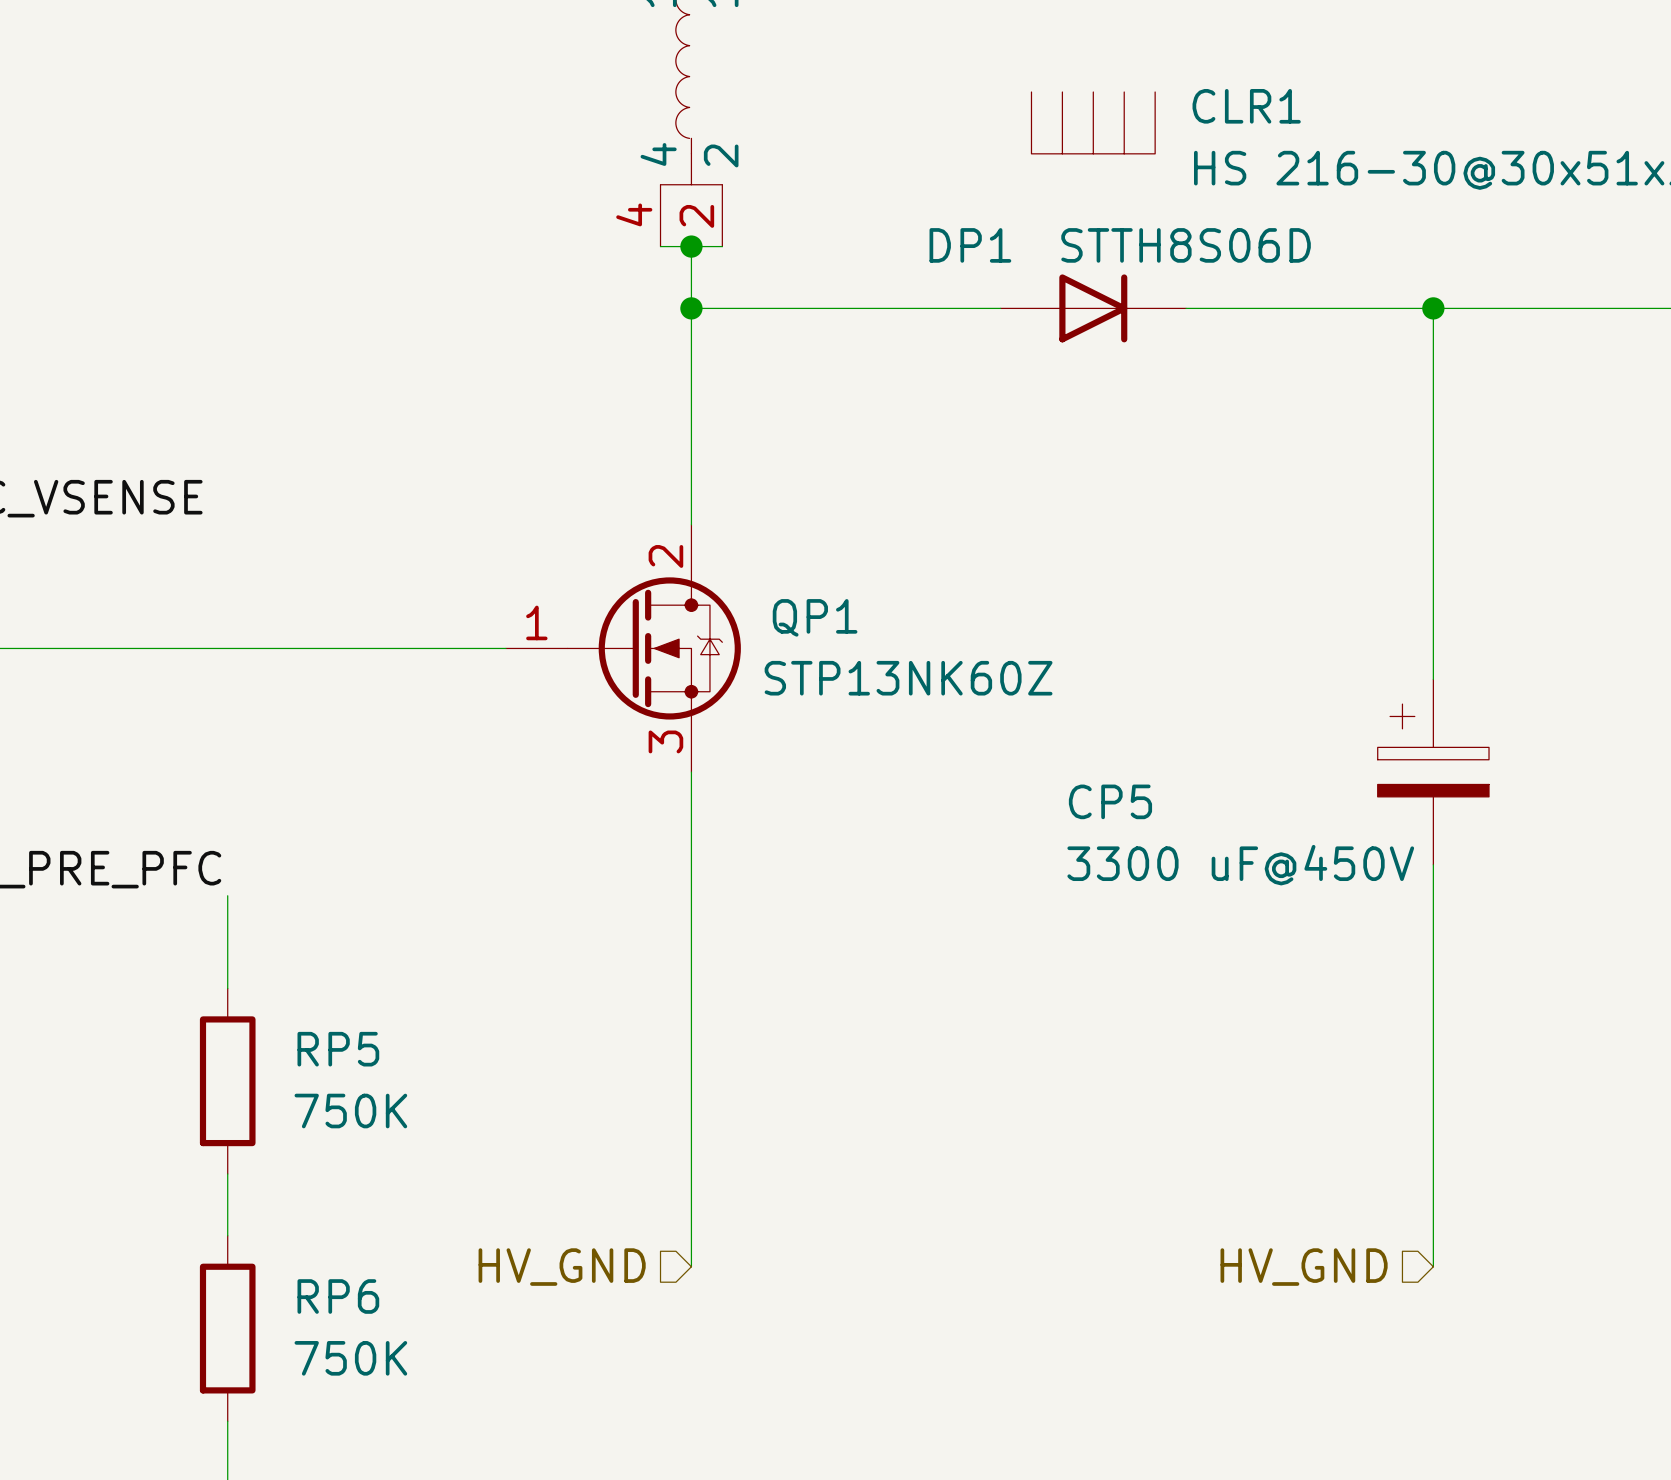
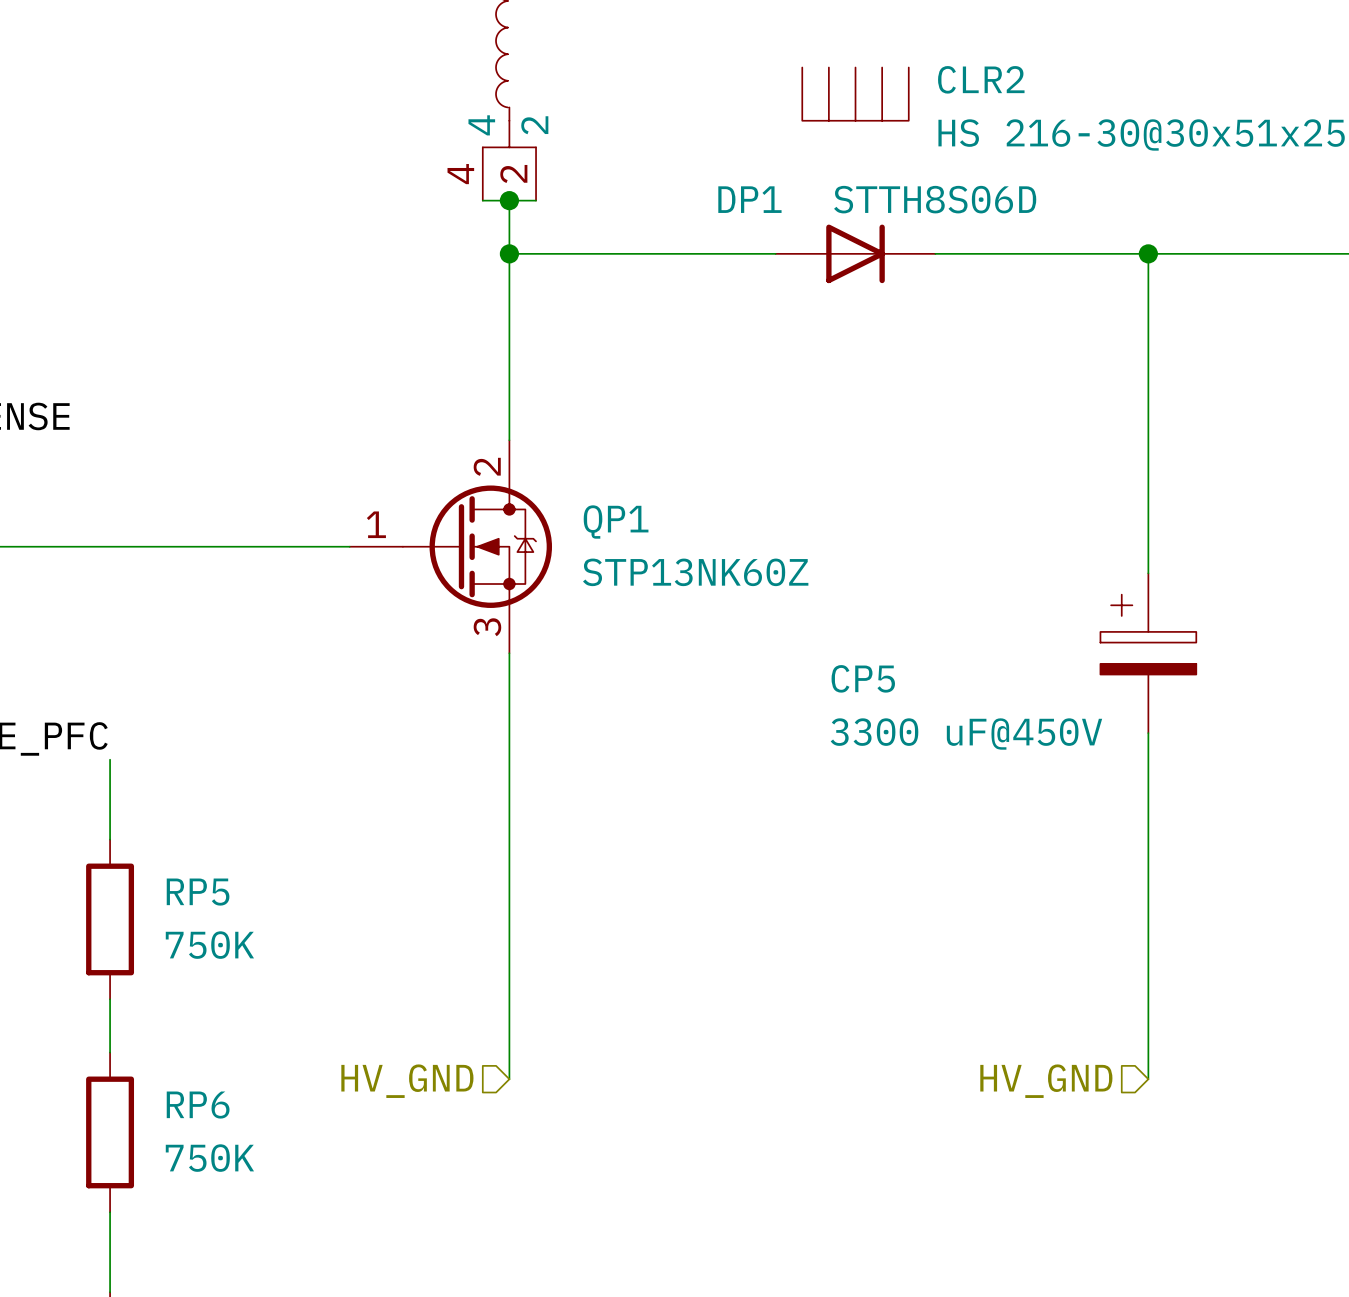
CLR1 name: CLR1 (1246, 106) -> CLR2 (981, 79)

